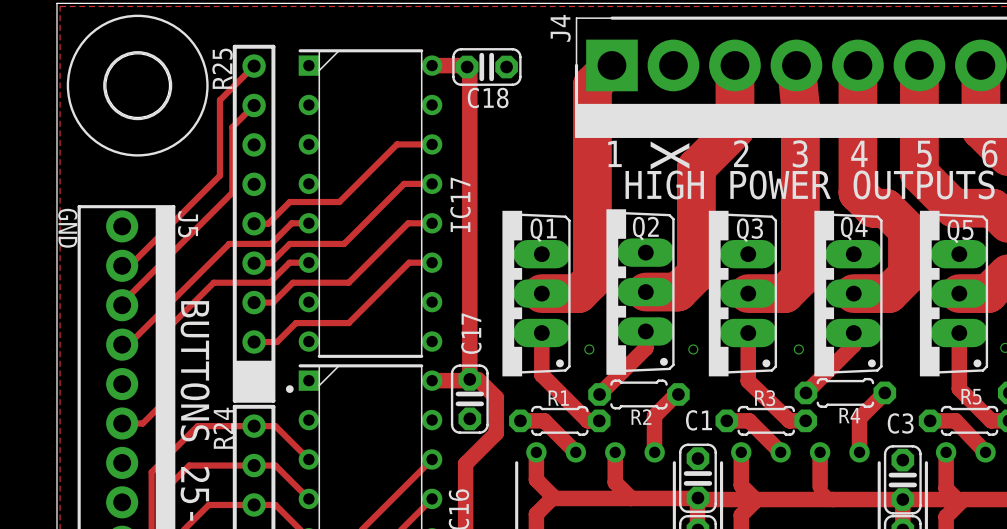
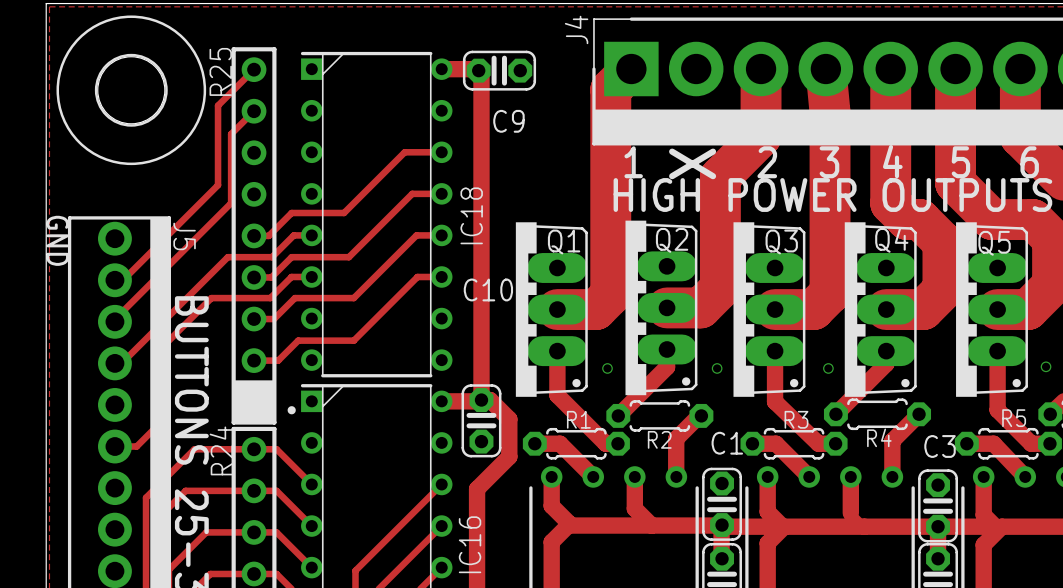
C18 name: C18 (488, 98) -> C9 (508, 121)
IC17 name: IC17 (460, 204) -> IC18 (471, 215)
C17 name: C17 (471, 333) -> C10 (488, 289)

